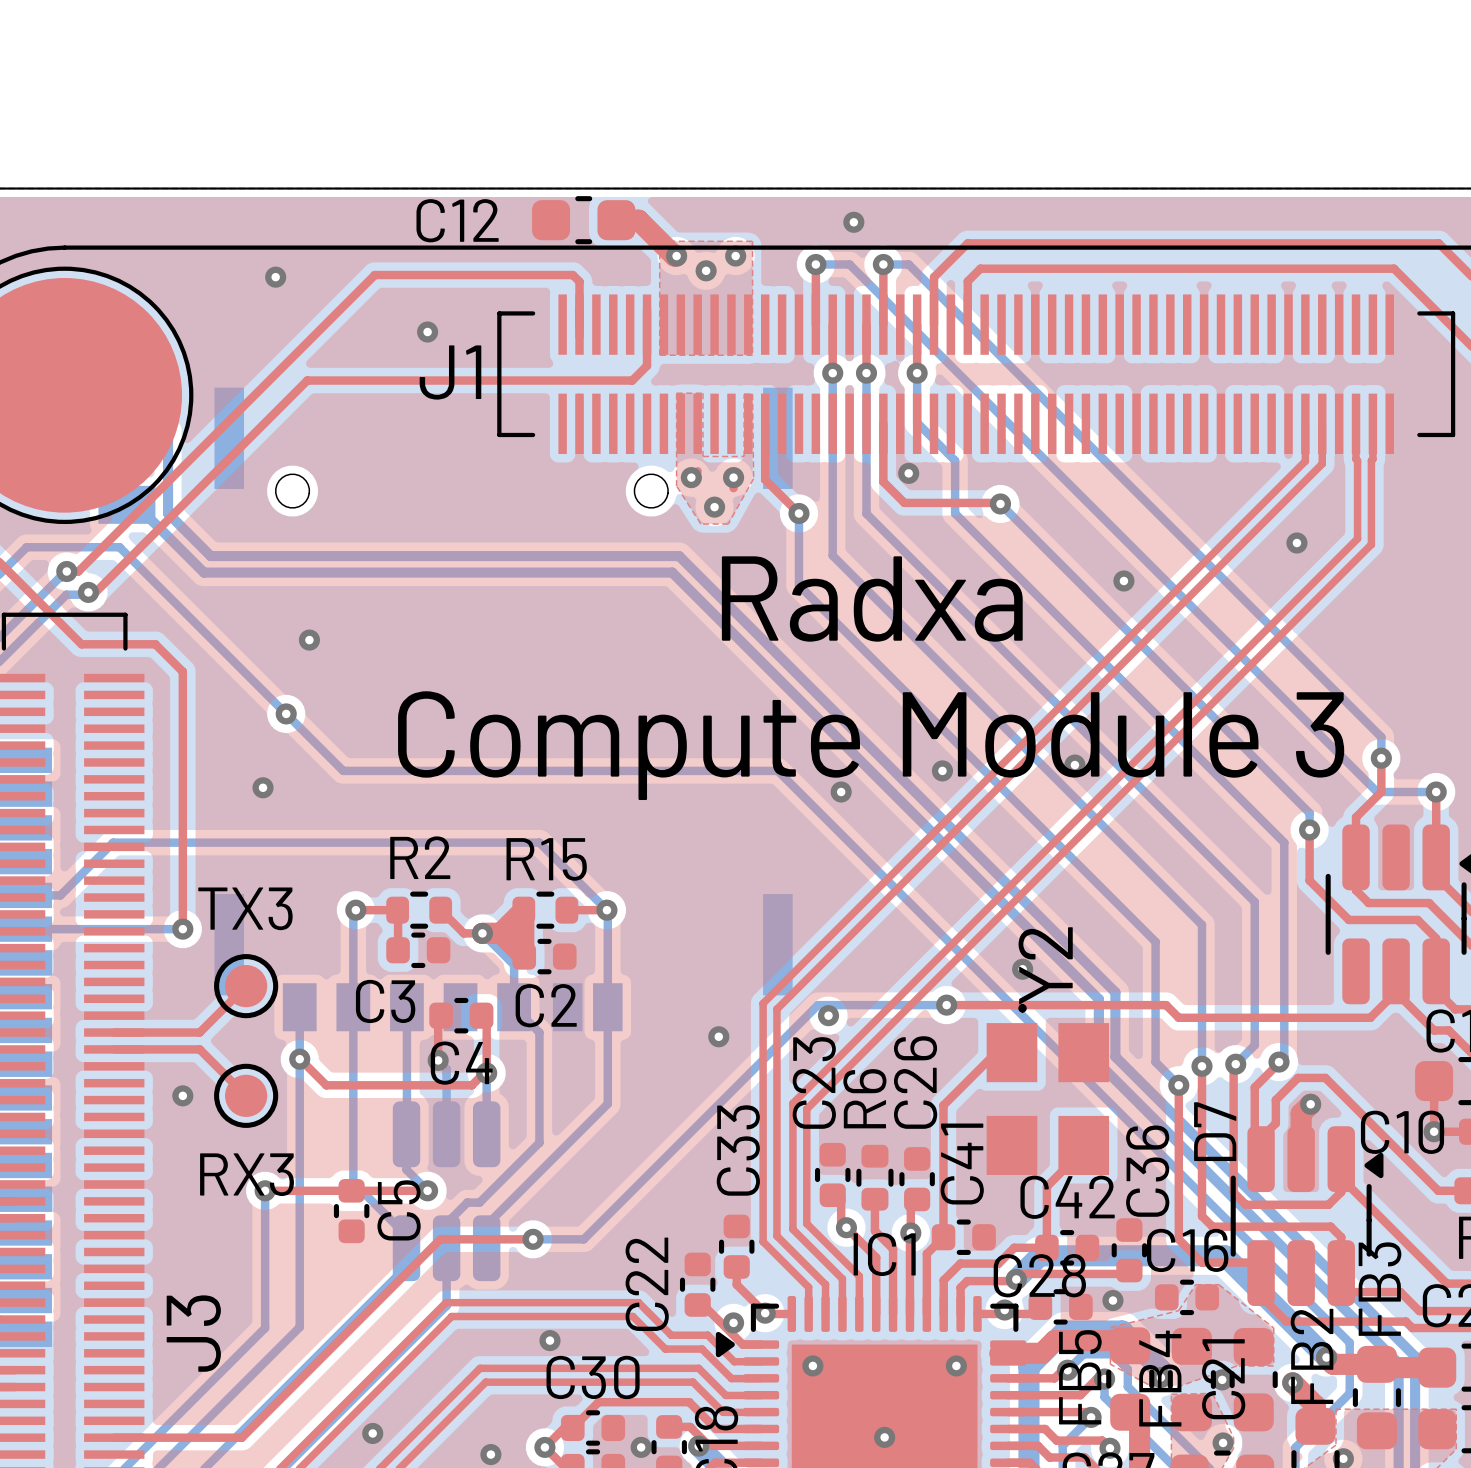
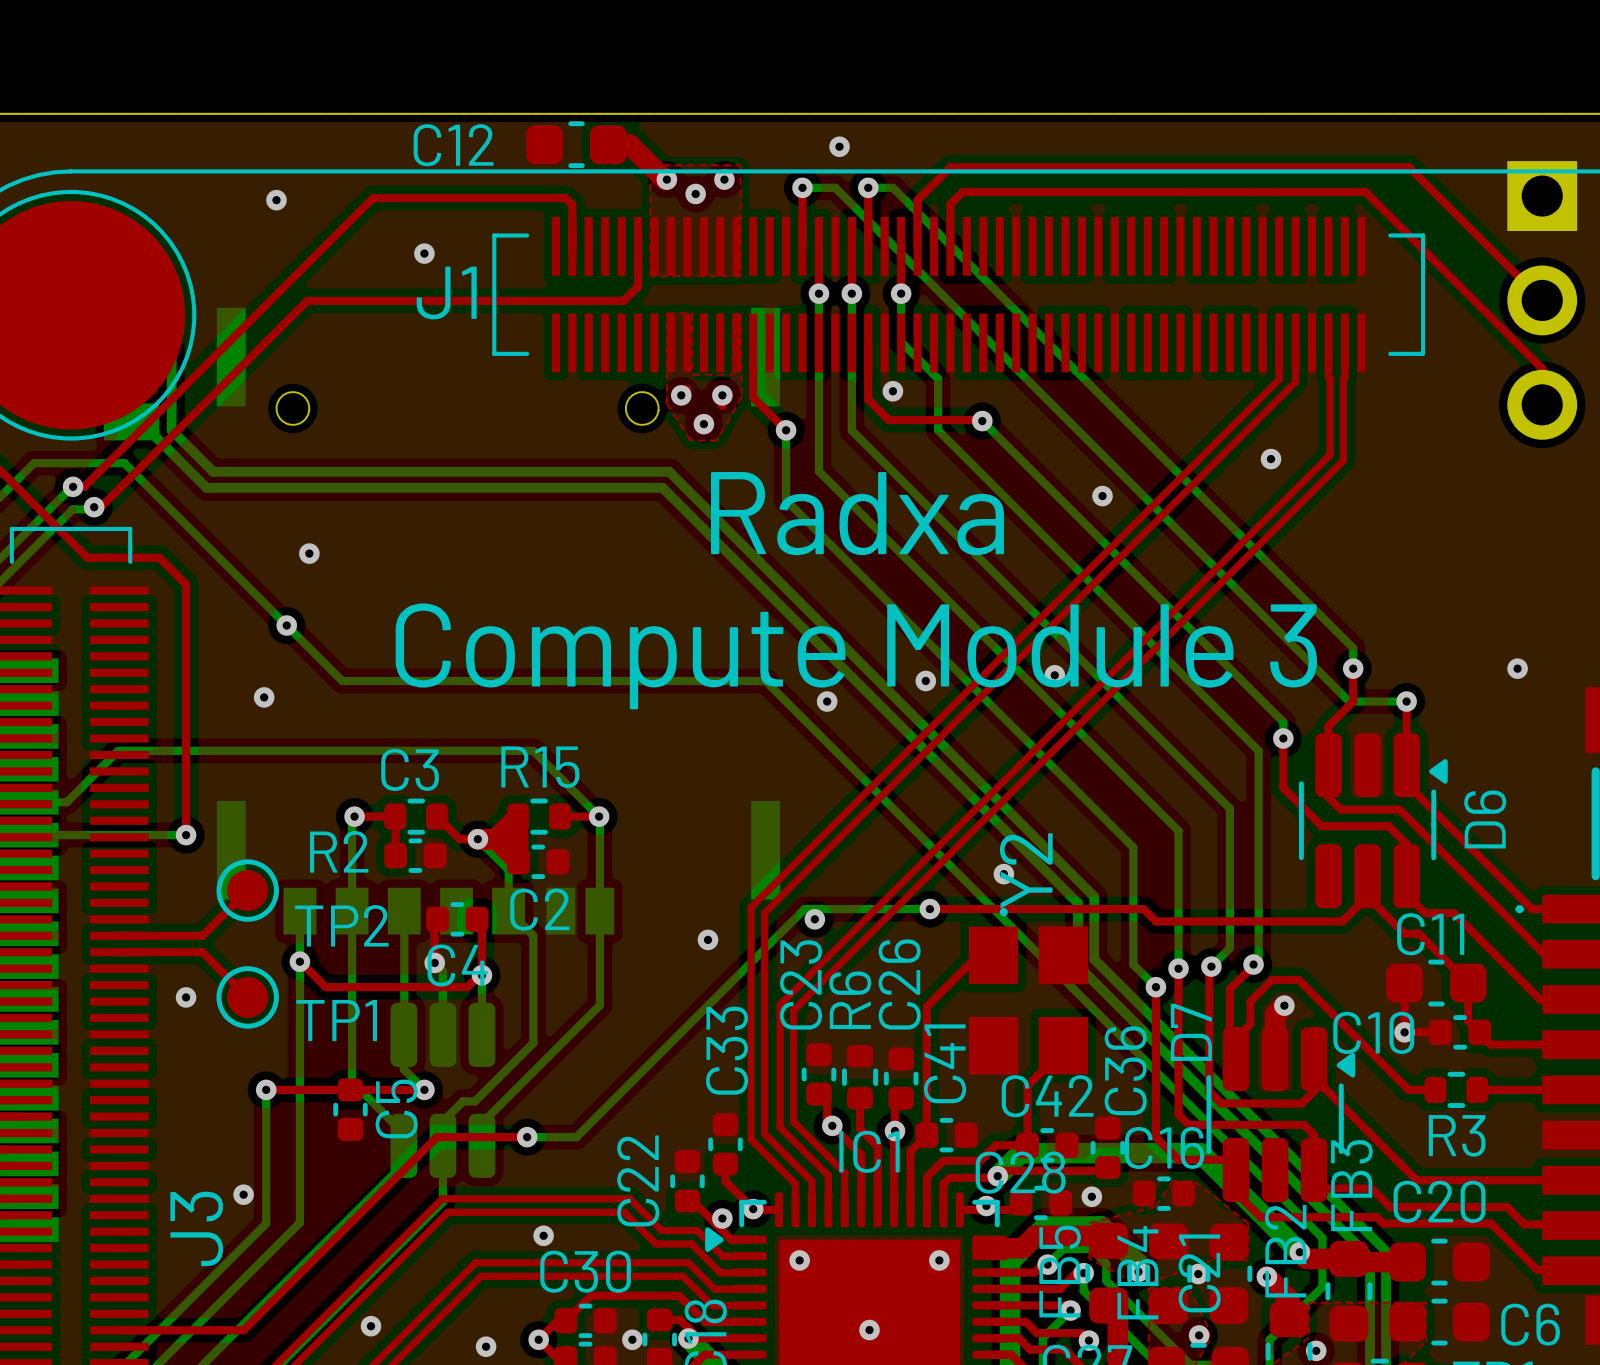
R2 name position: R2 (420, 857) -> R2 (339, 851)
TX3 name: TX3 (245, 908) -> TP2 (341, 925)
C3 name position: C3 (385, 1001) -> C3 (410, 769)
RX3 name: RX3 (247, 1174) -> TP1 (336, 1020)
via: none -> (243, 1194)

